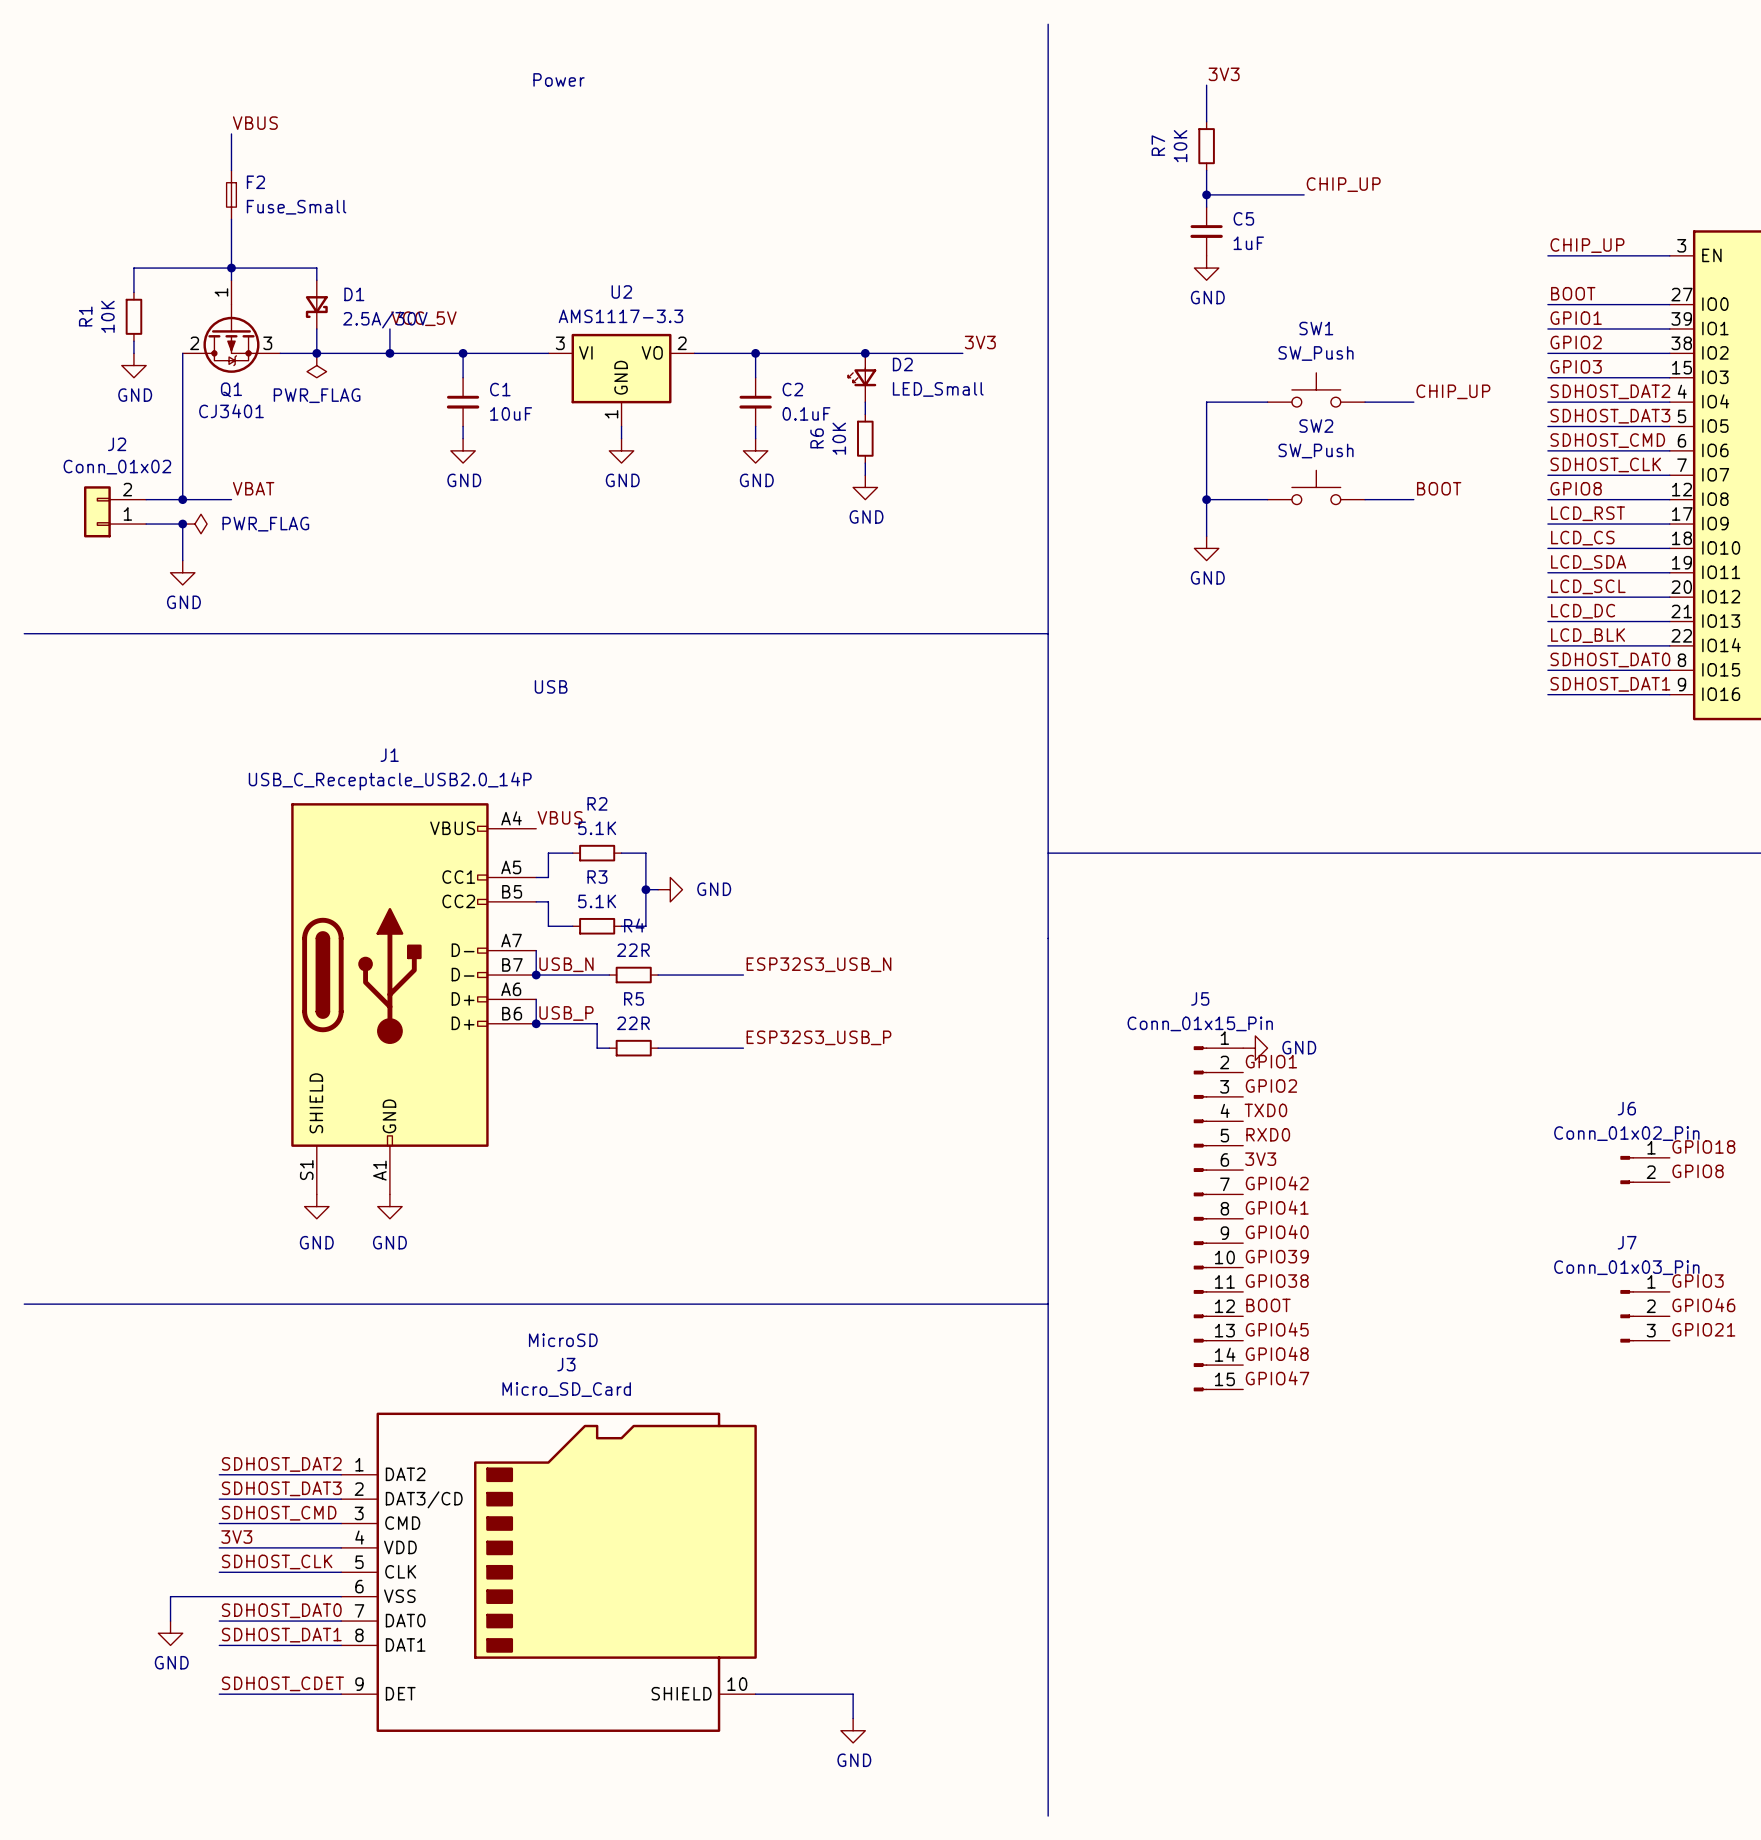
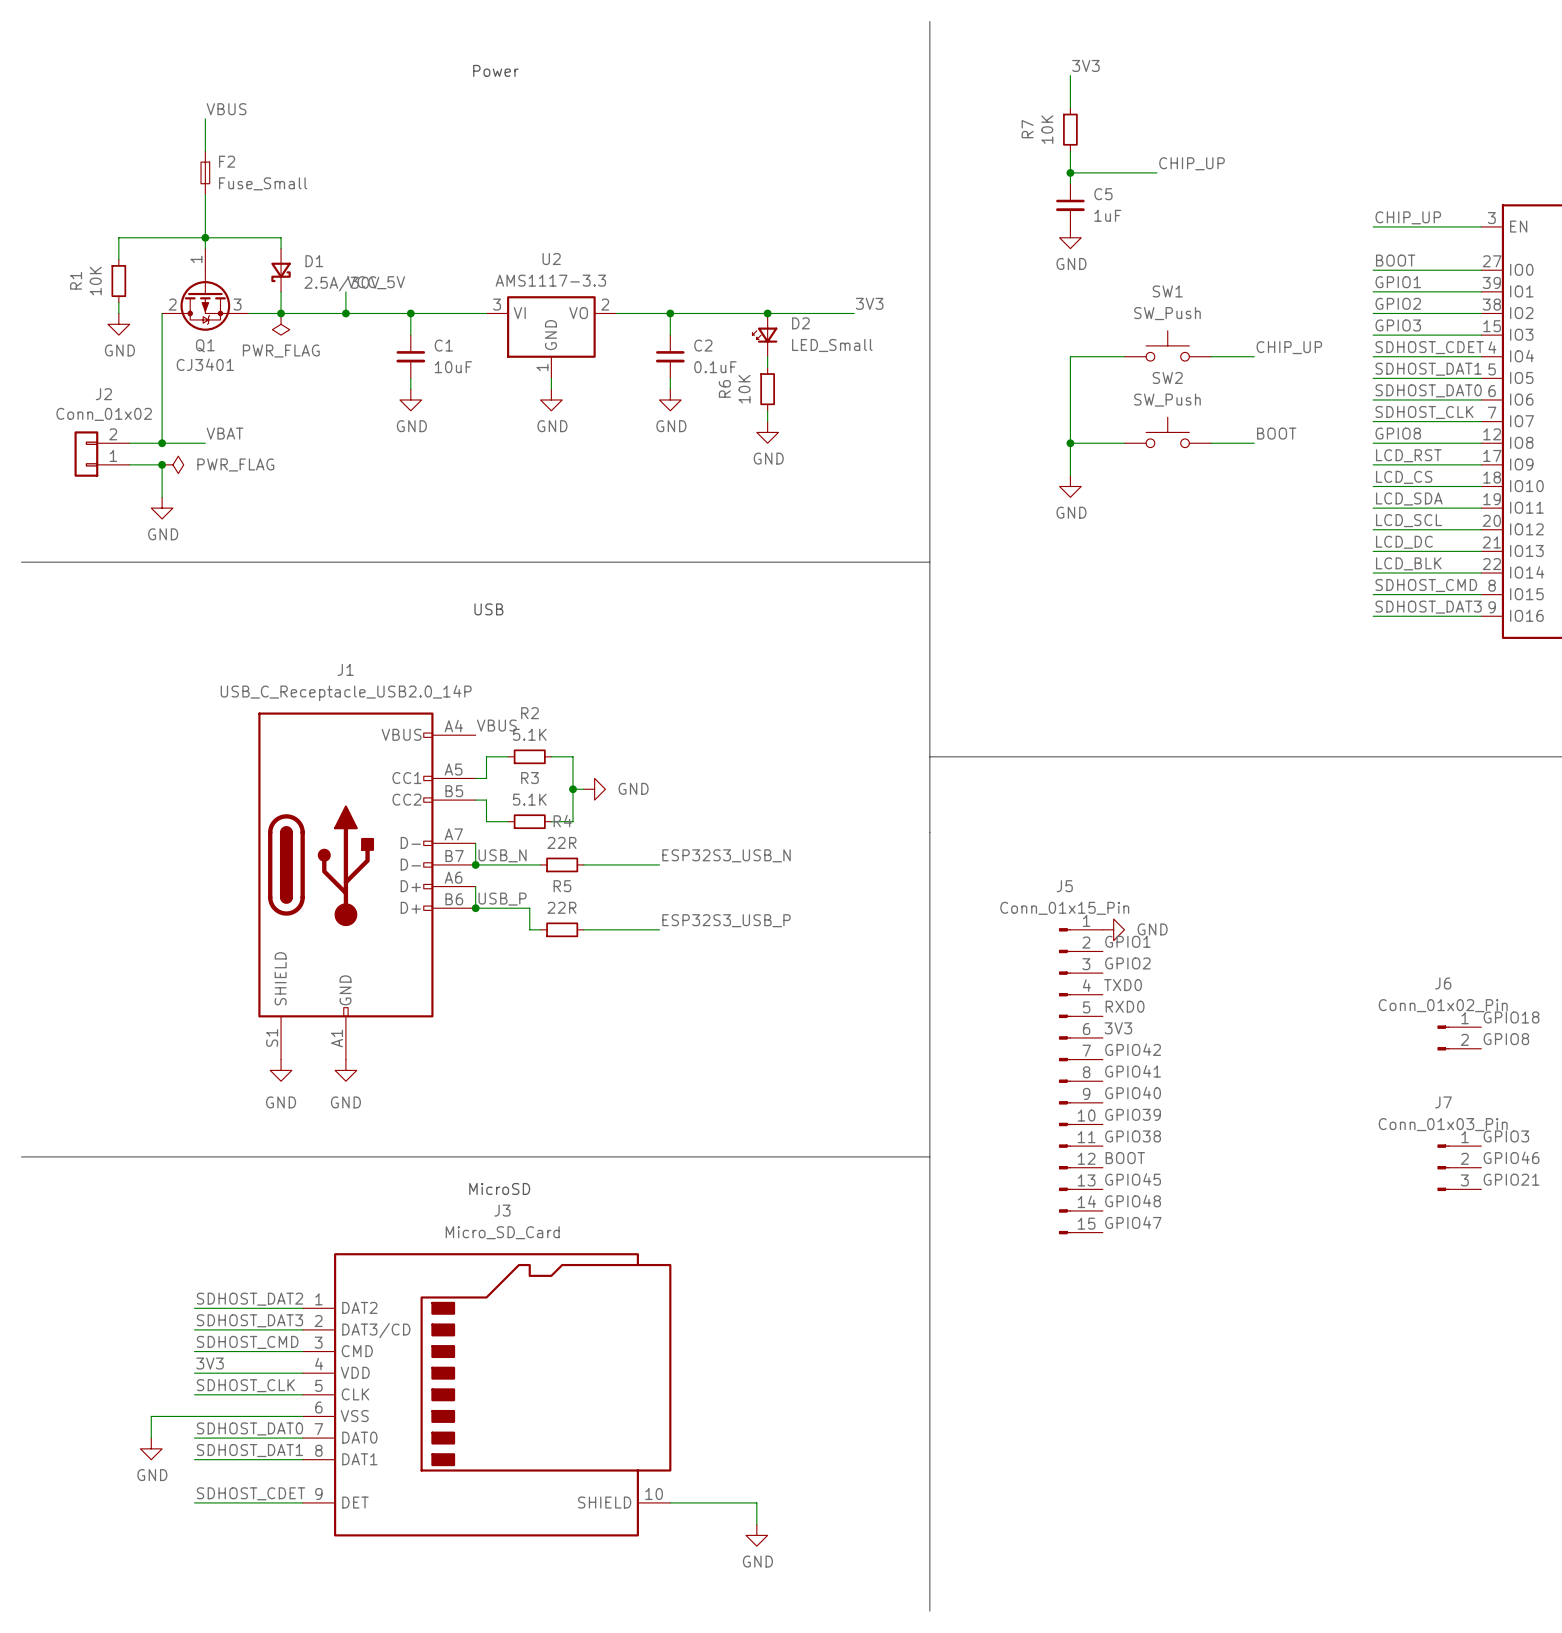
label: SDHOST_DAT2 (1610, 391) -> SDHOST_CDET (1429, 347)
label: SDHOST_DAT3 (1610, 416) -> SDHOST_DAT1 (1428, 369)
label: SDHOST_CMD (1607, 440) -> SDHOST_DAT0 (1428, 390)
label: SDHOST_DAT0 (1610, 659) -> SDHOST_CMD (1426, 585)
label: SDHOST_DAT1 (1610, 684) -> SDHOST_DAT3 (1428, 607)

